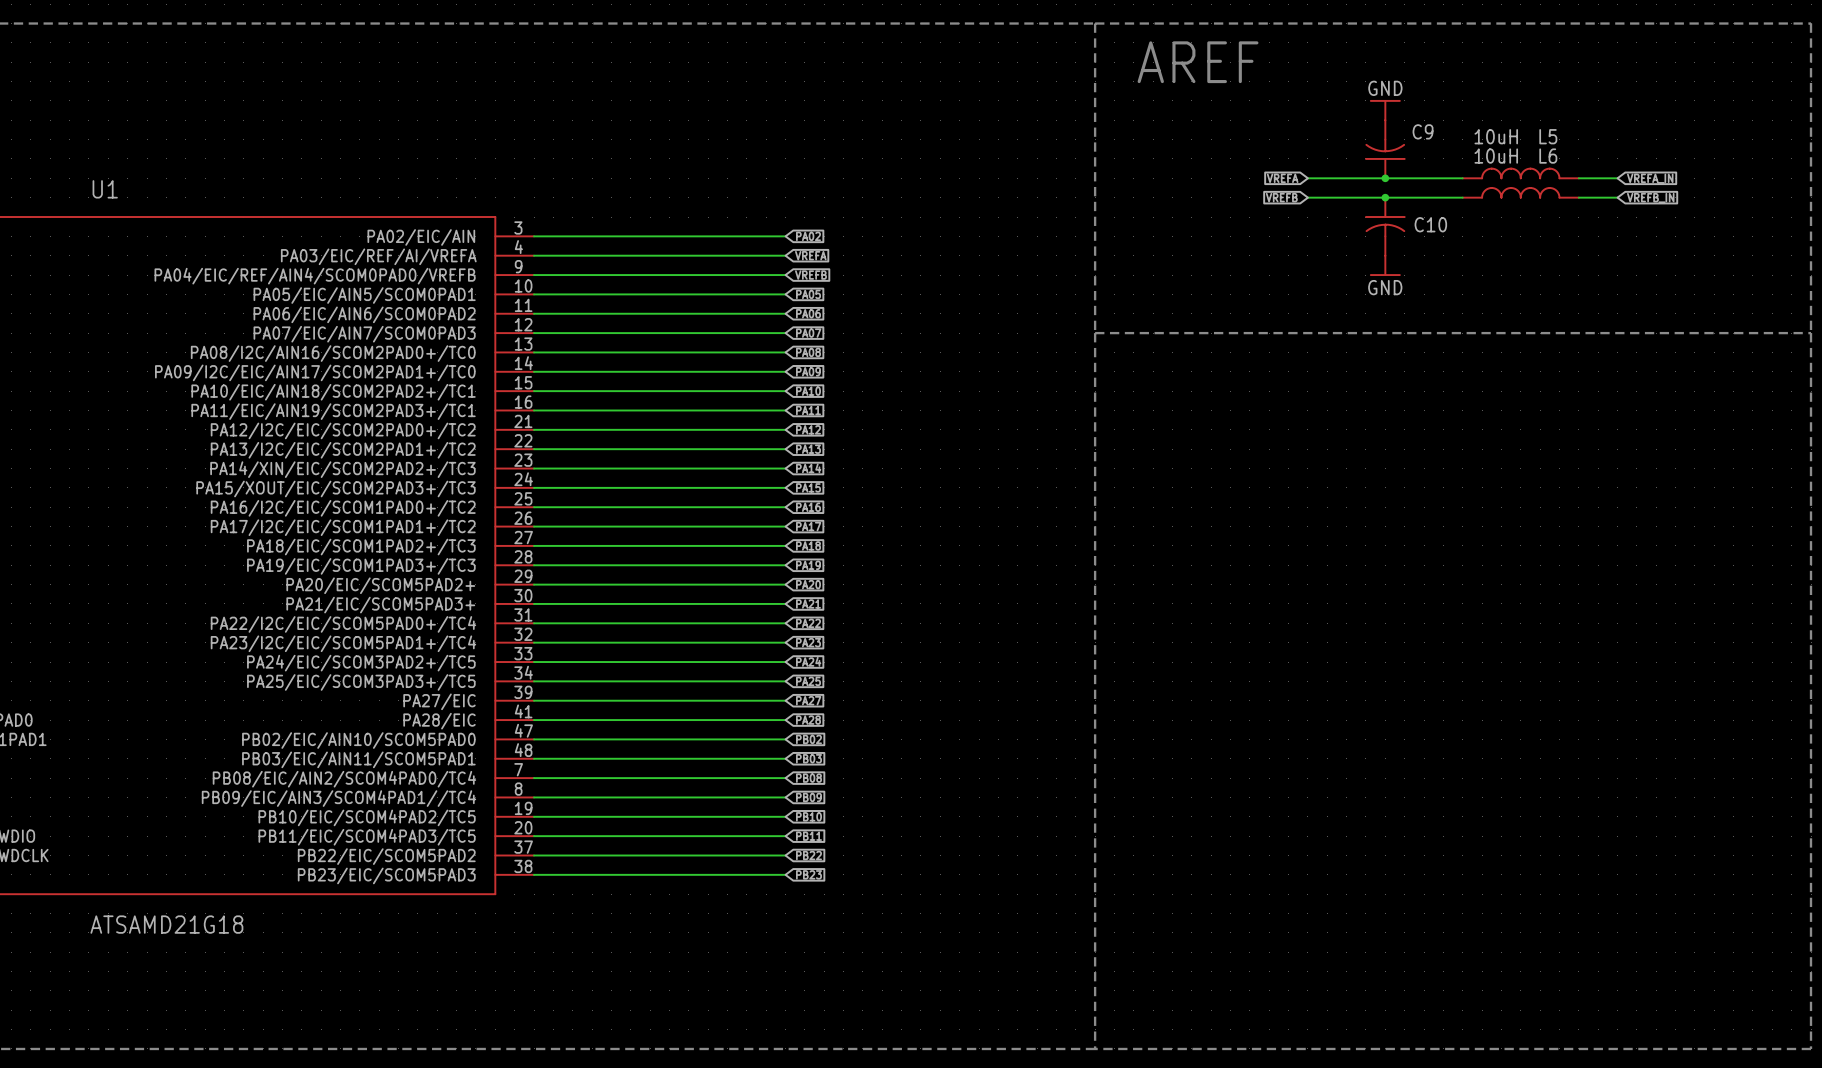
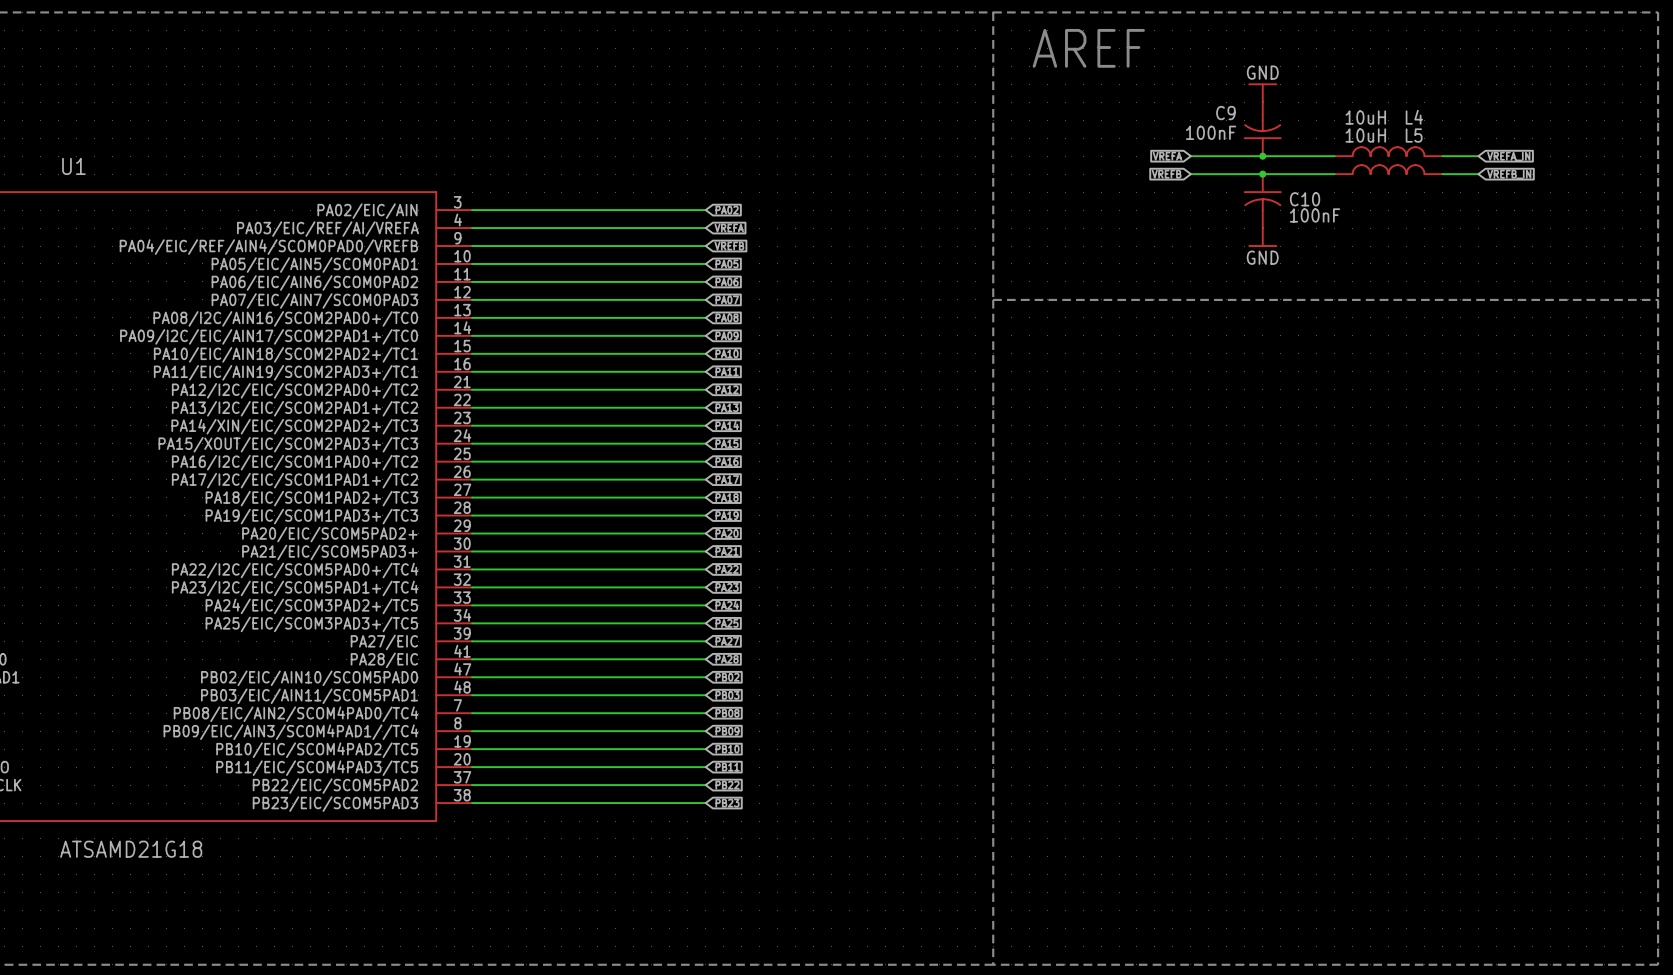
C9 name position: C9 (1423, 131) -> C9 (1225, 113)
L5 name: L5 (1548, 136) -> L4 (1414, 117)
C9 value: none -> 100nF (1211, 132)
L6 name: L6 (1548, 156) -> L5 (1414, 135)
C10 value: none -> 100nF (1315, 215)

